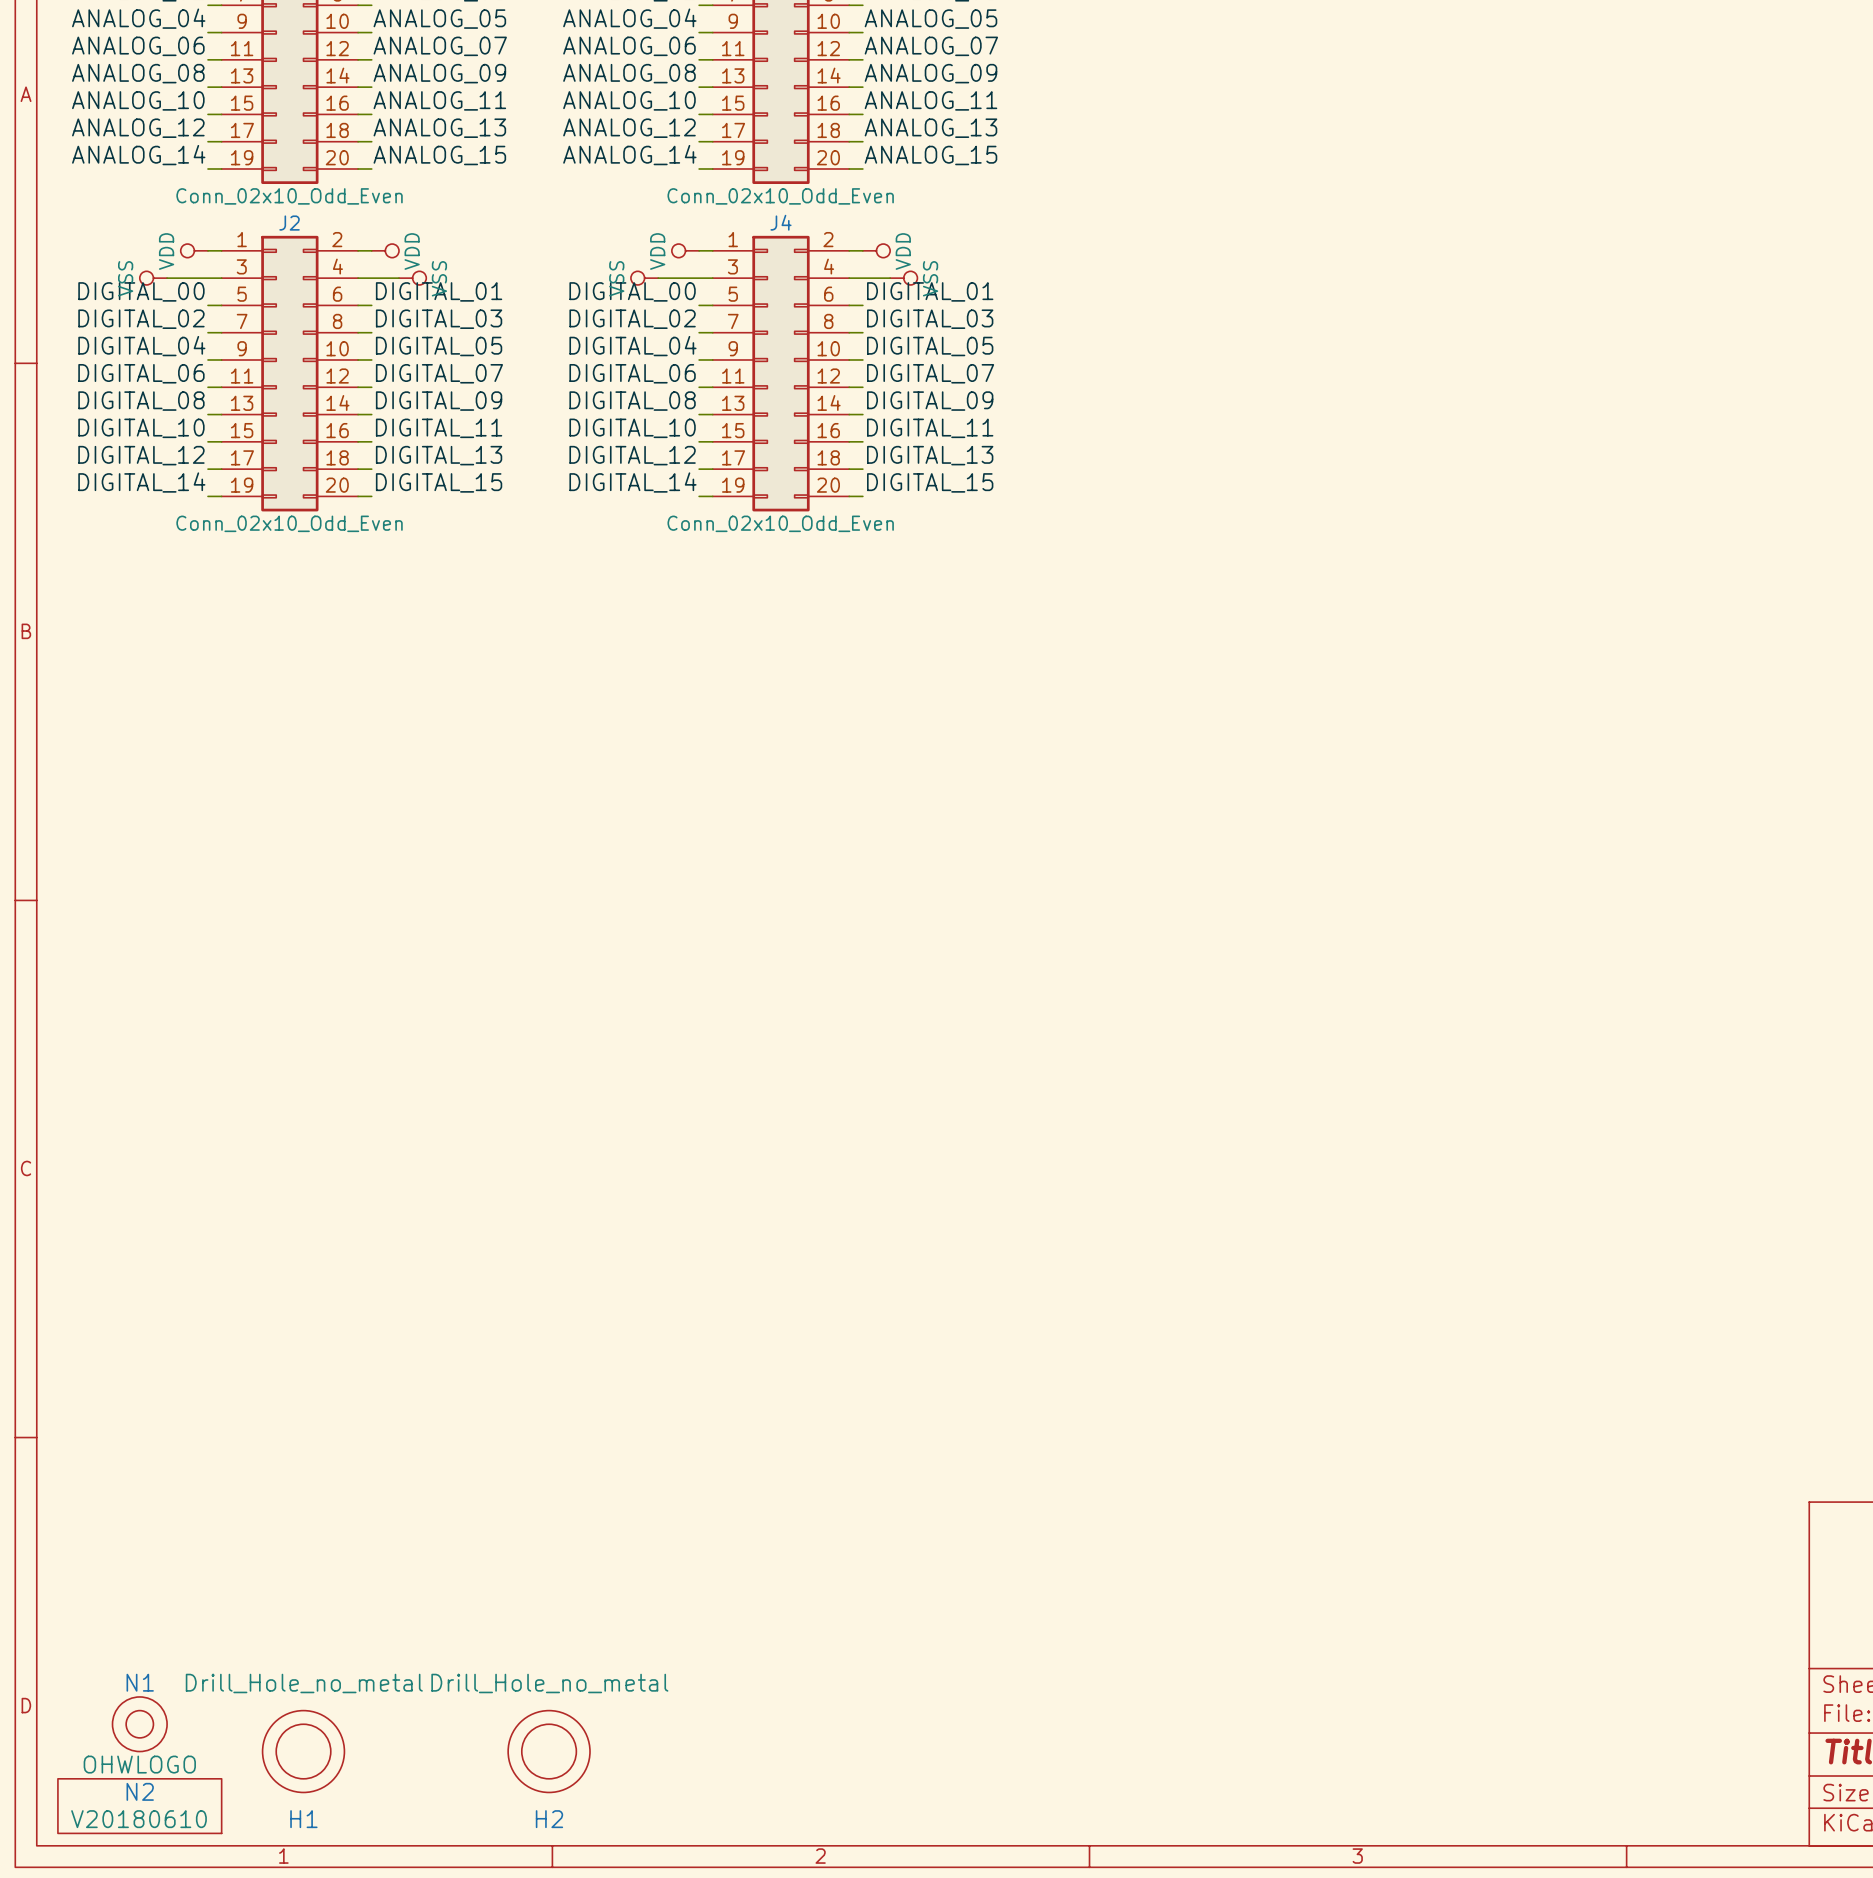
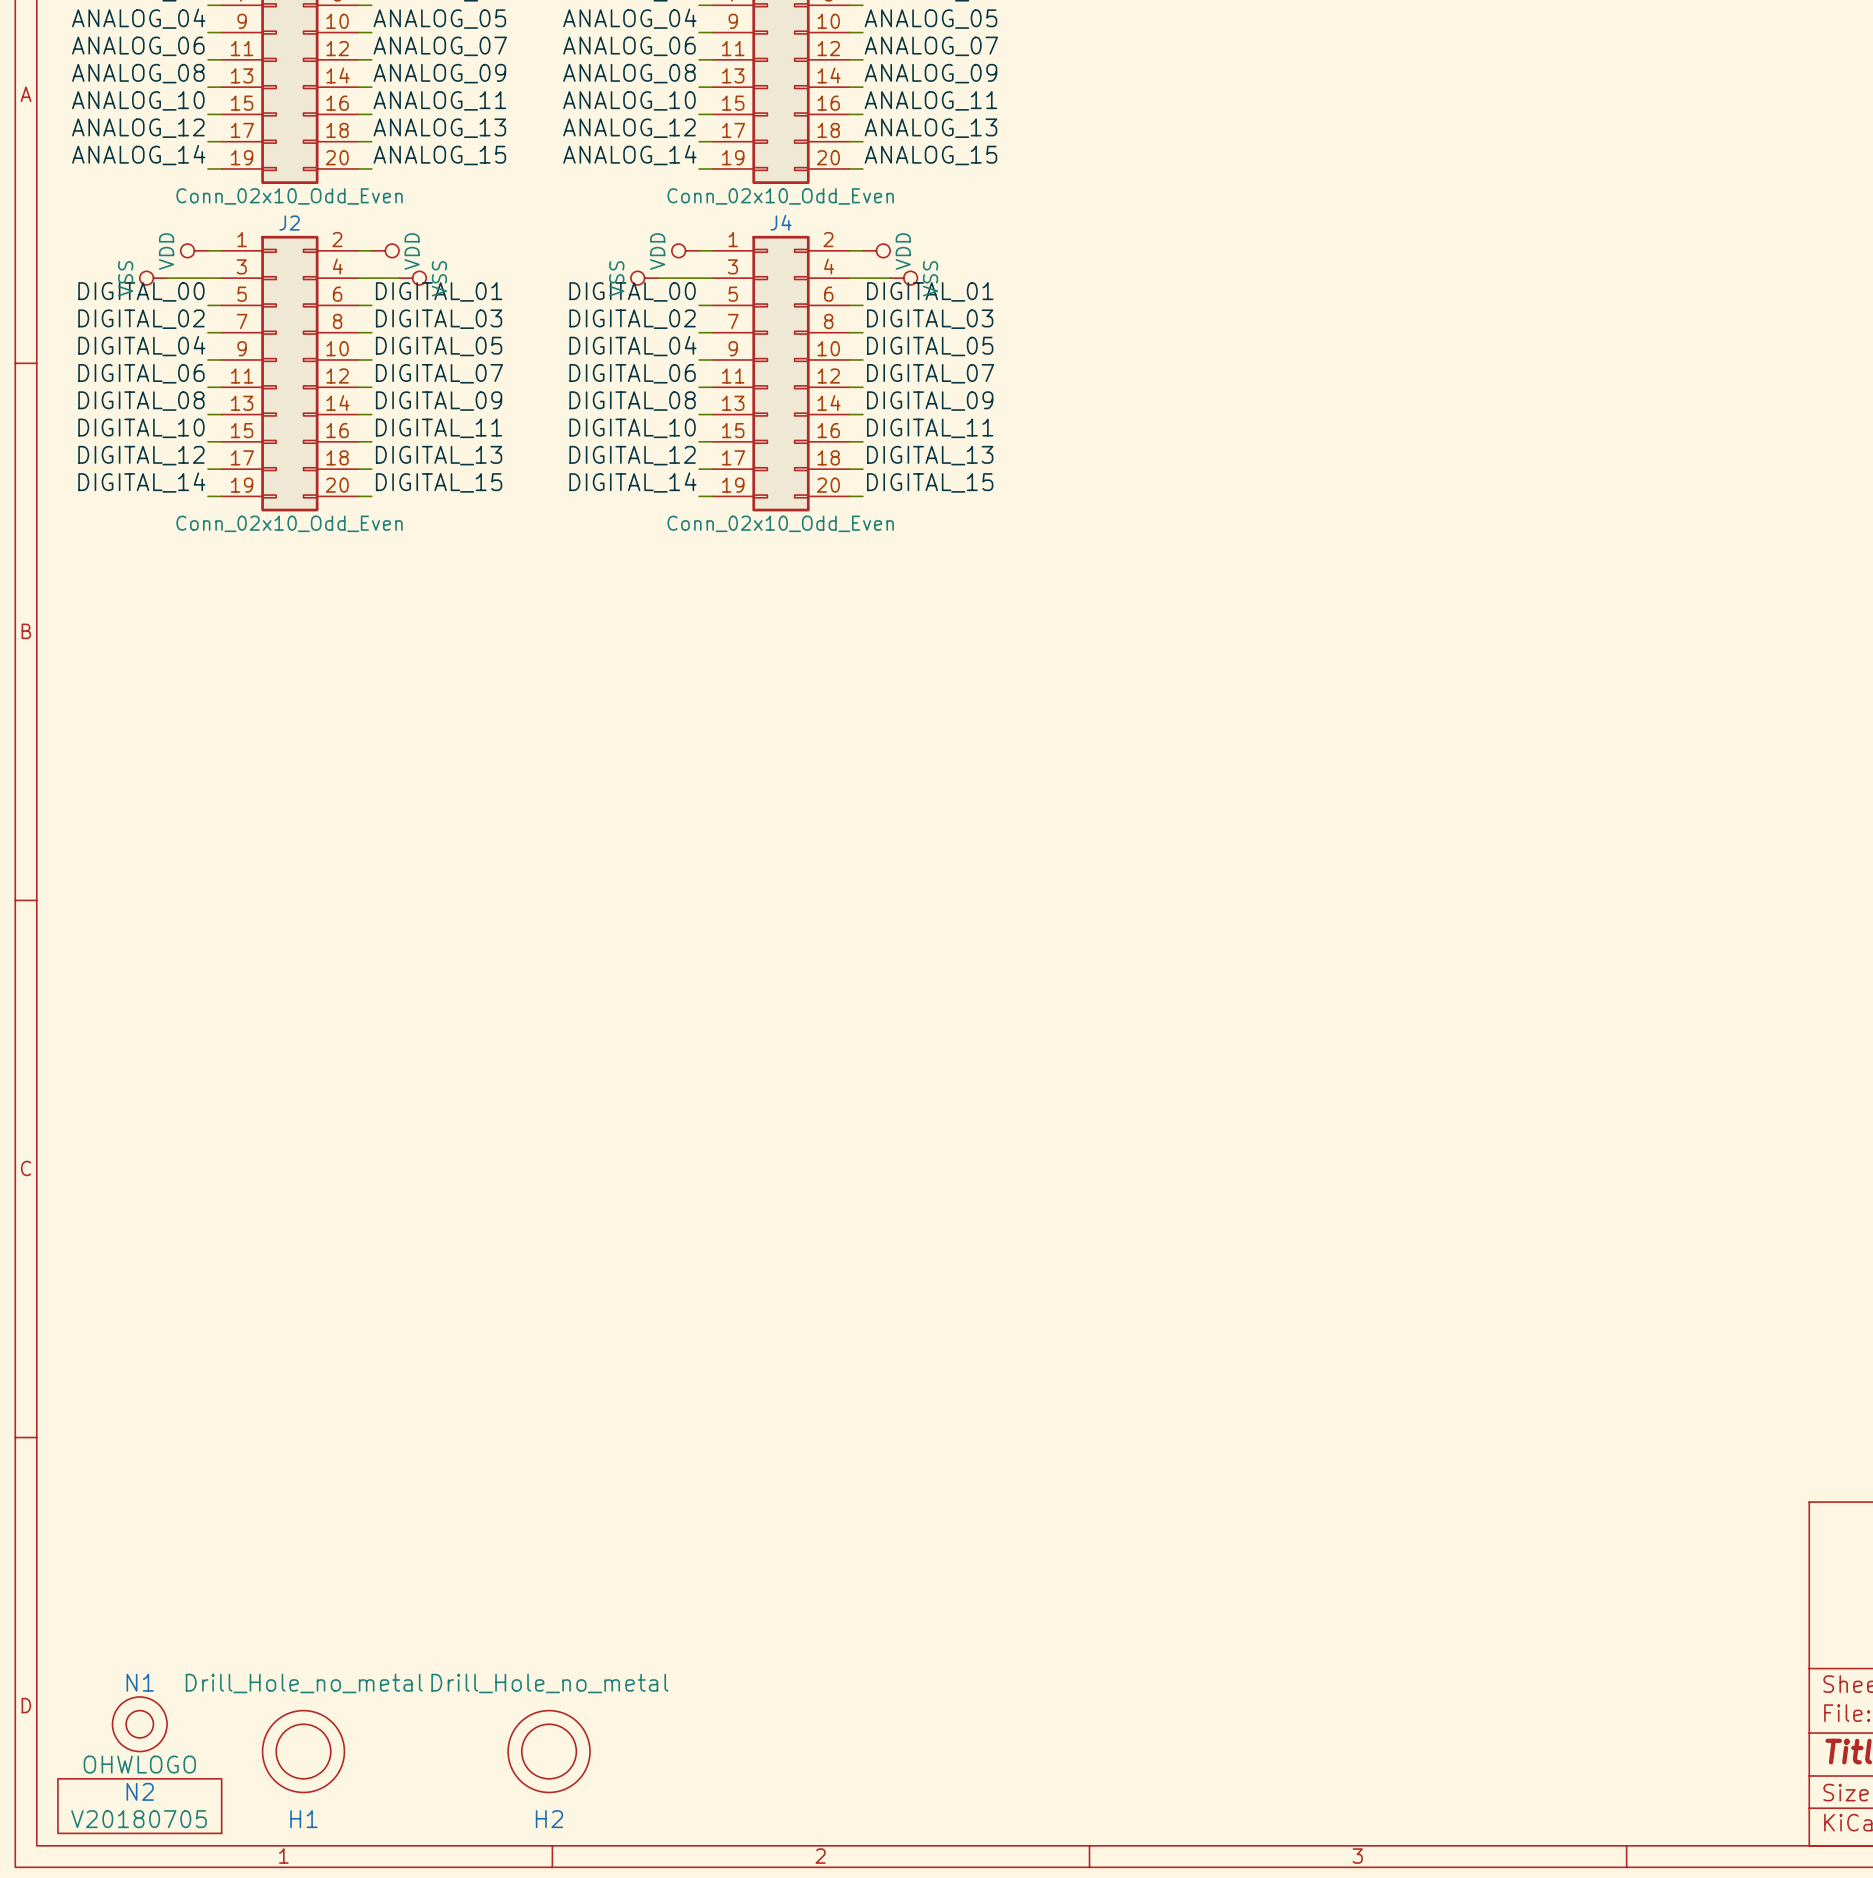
N2 value: V20180610 (139, 1819) -> V20180705 (139, 1819)

